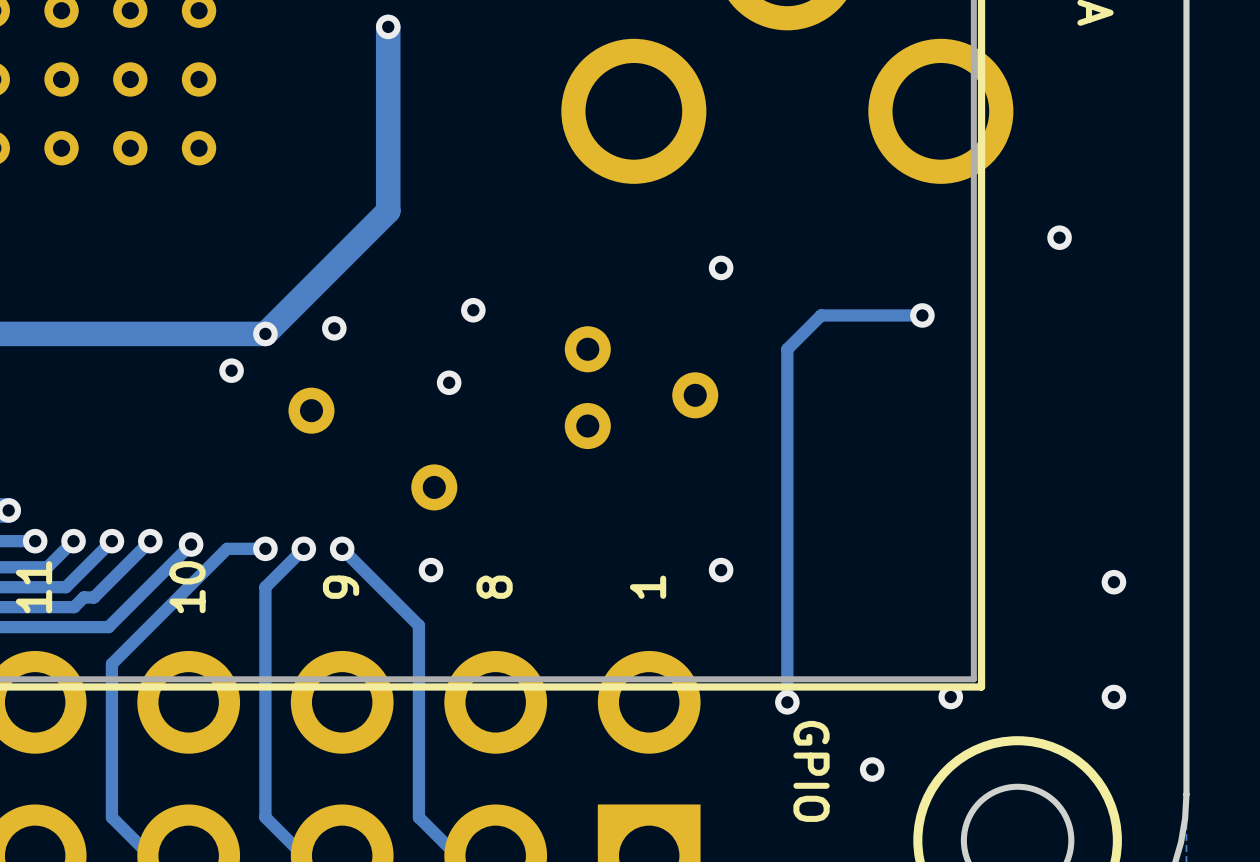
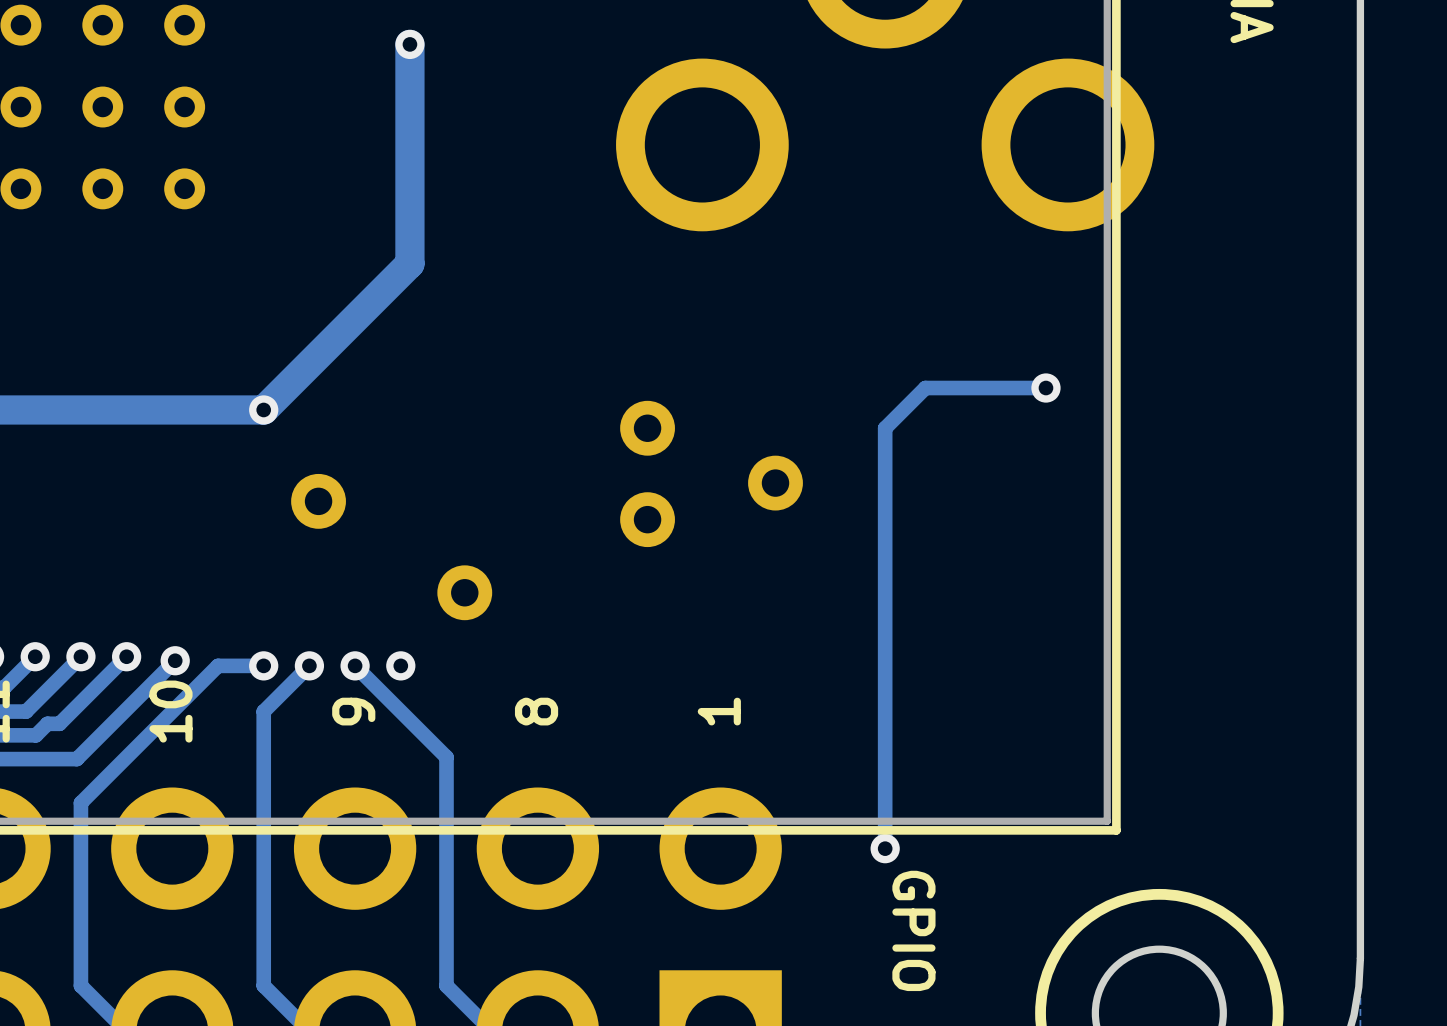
via: (1059, 237) -> none
via: (721, 267) -> none
via: (473, 310) -> none
via: (334, 328) -> none
via: (231, 370) -> none
via: (449, 382) -> none
via position: (431, 570) -> (400, 665)
via: (721, 570) -> none
via: (1113, 582) -> none
via: (950, 697) -> none
via: (1113, 697) -> none
via: (872, 769) -> none

